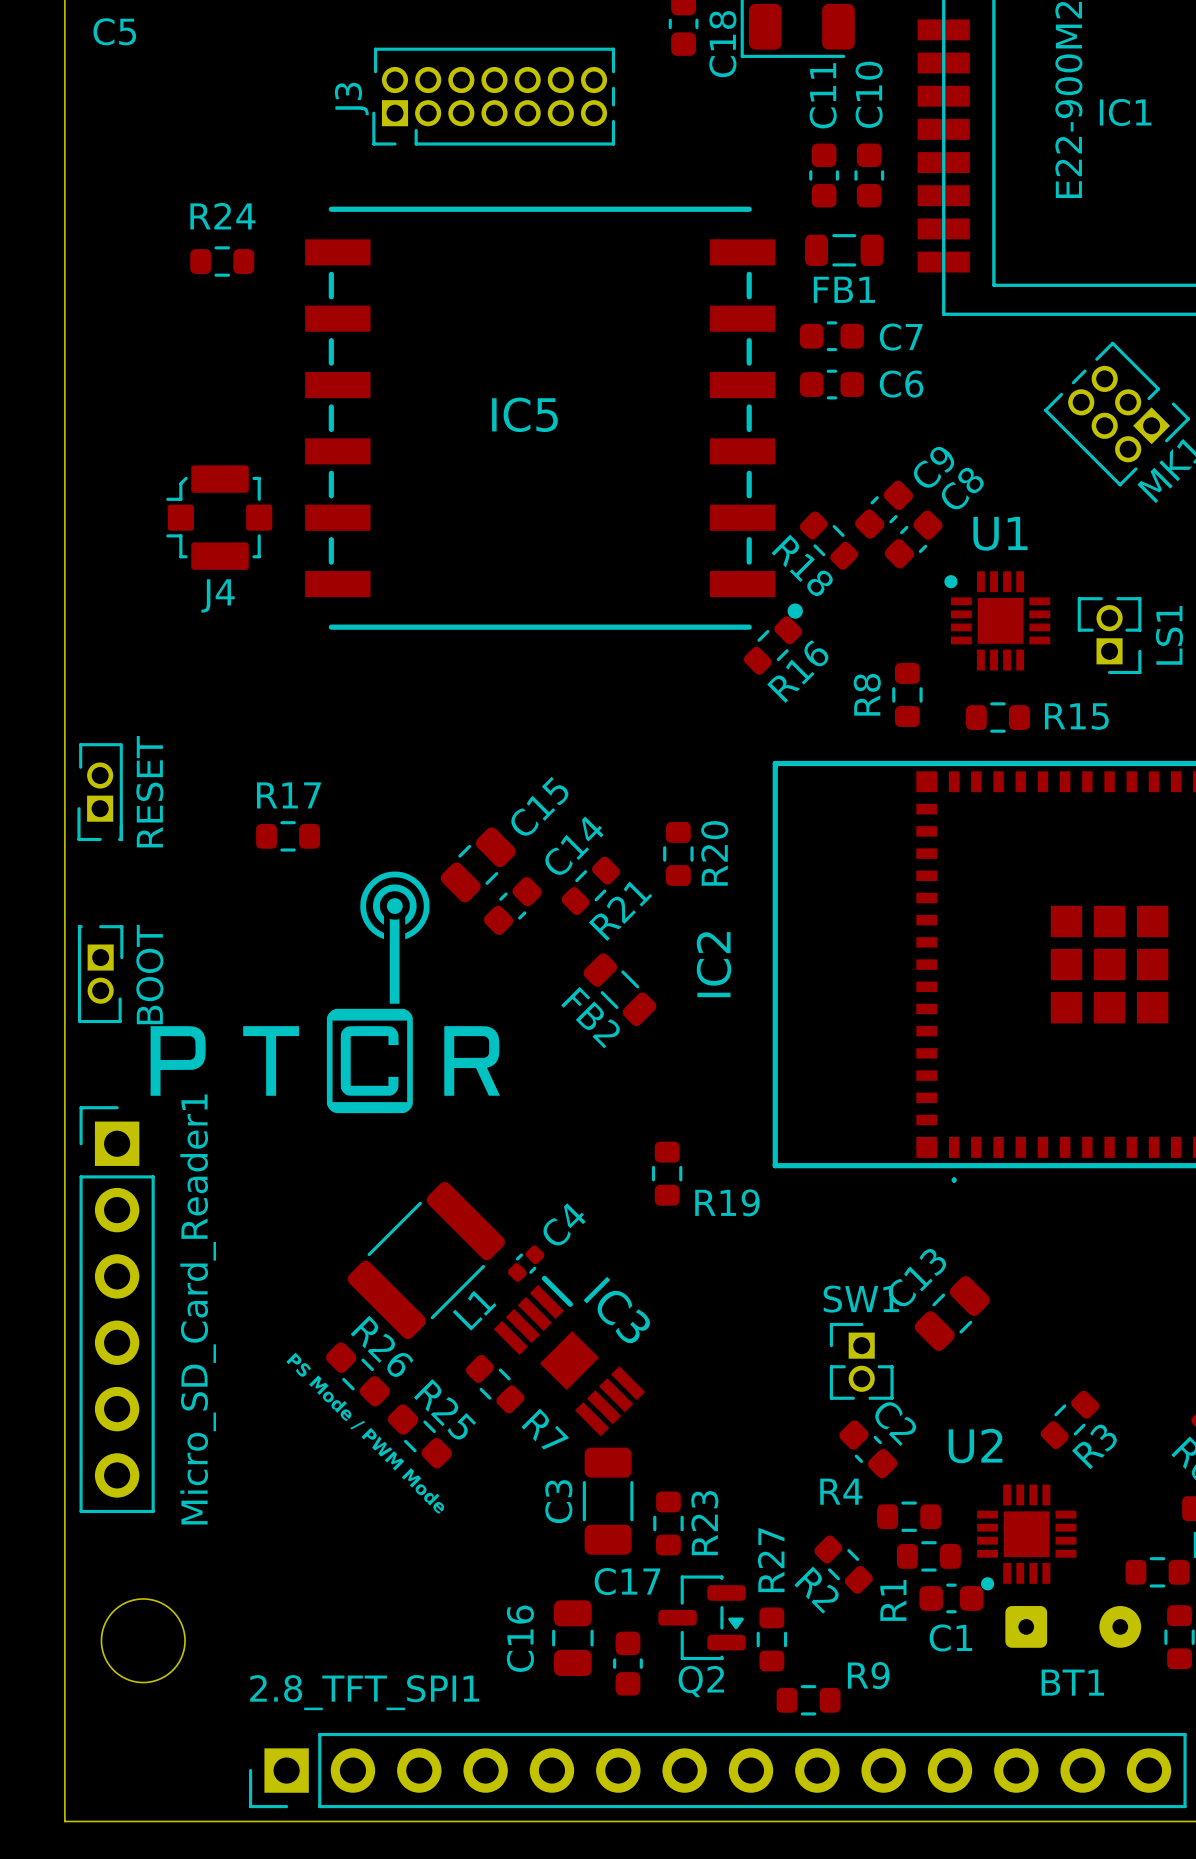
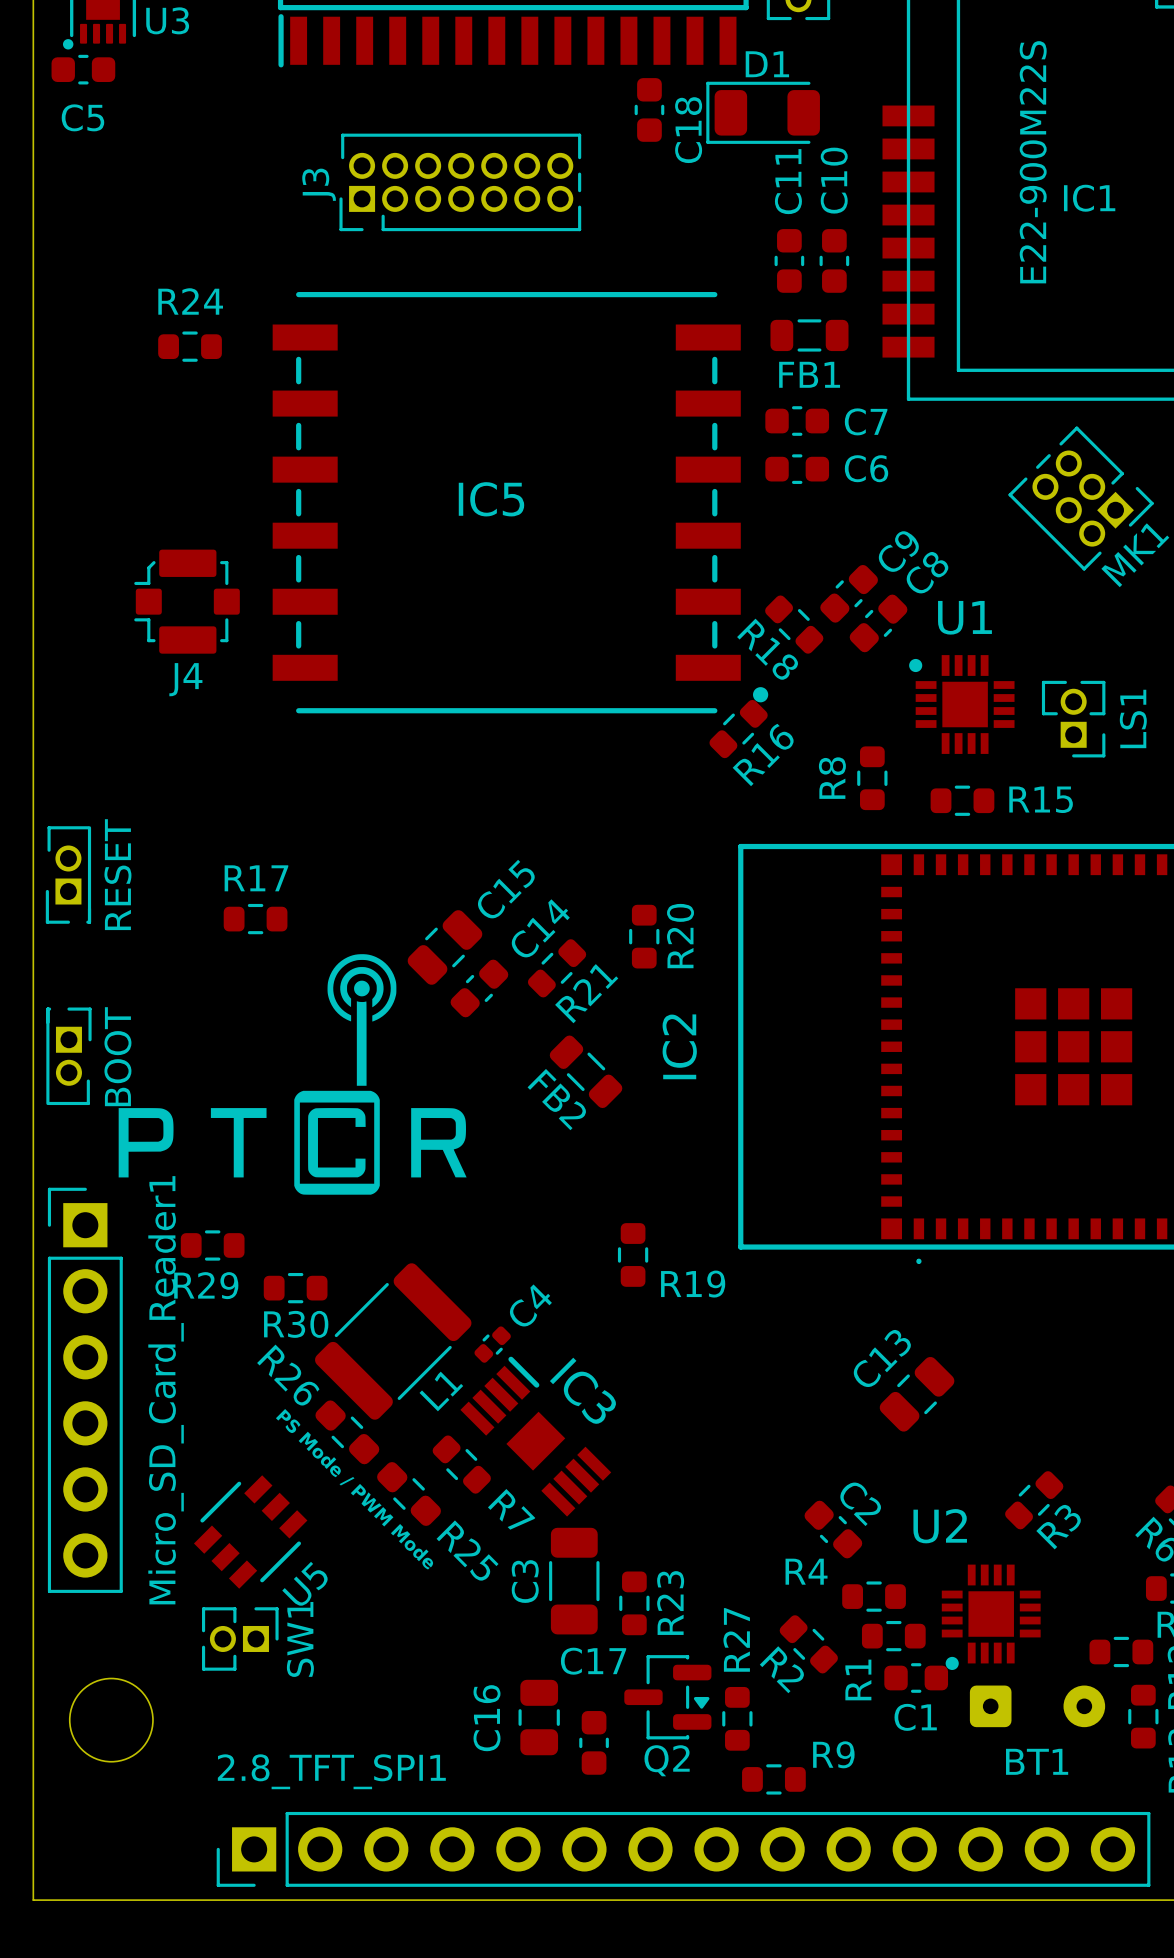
R29: none -> (212, 1245)
R30: none -> (295, 1288)
R26 name position: R26 (382, 1346) -> R26 (288, 1375)
SW1 rotation: 0° (861, 1361) -> 90° clockwise (240, 1638)
SW1 position: (861, 1361) -> (240, 1638)
R26 position: (358, 1374) -> (347, 1432)
R25 name position: R25 (445, 1409) -> R25 (467, 1550)
text position: PS Mode / PWM Mode (365, 1433) -> PS Mode / PWM Mode (354, 1489)
R25 position: (419, 1436) -> (409, 1494)
U5: none -> (250, 1532)

